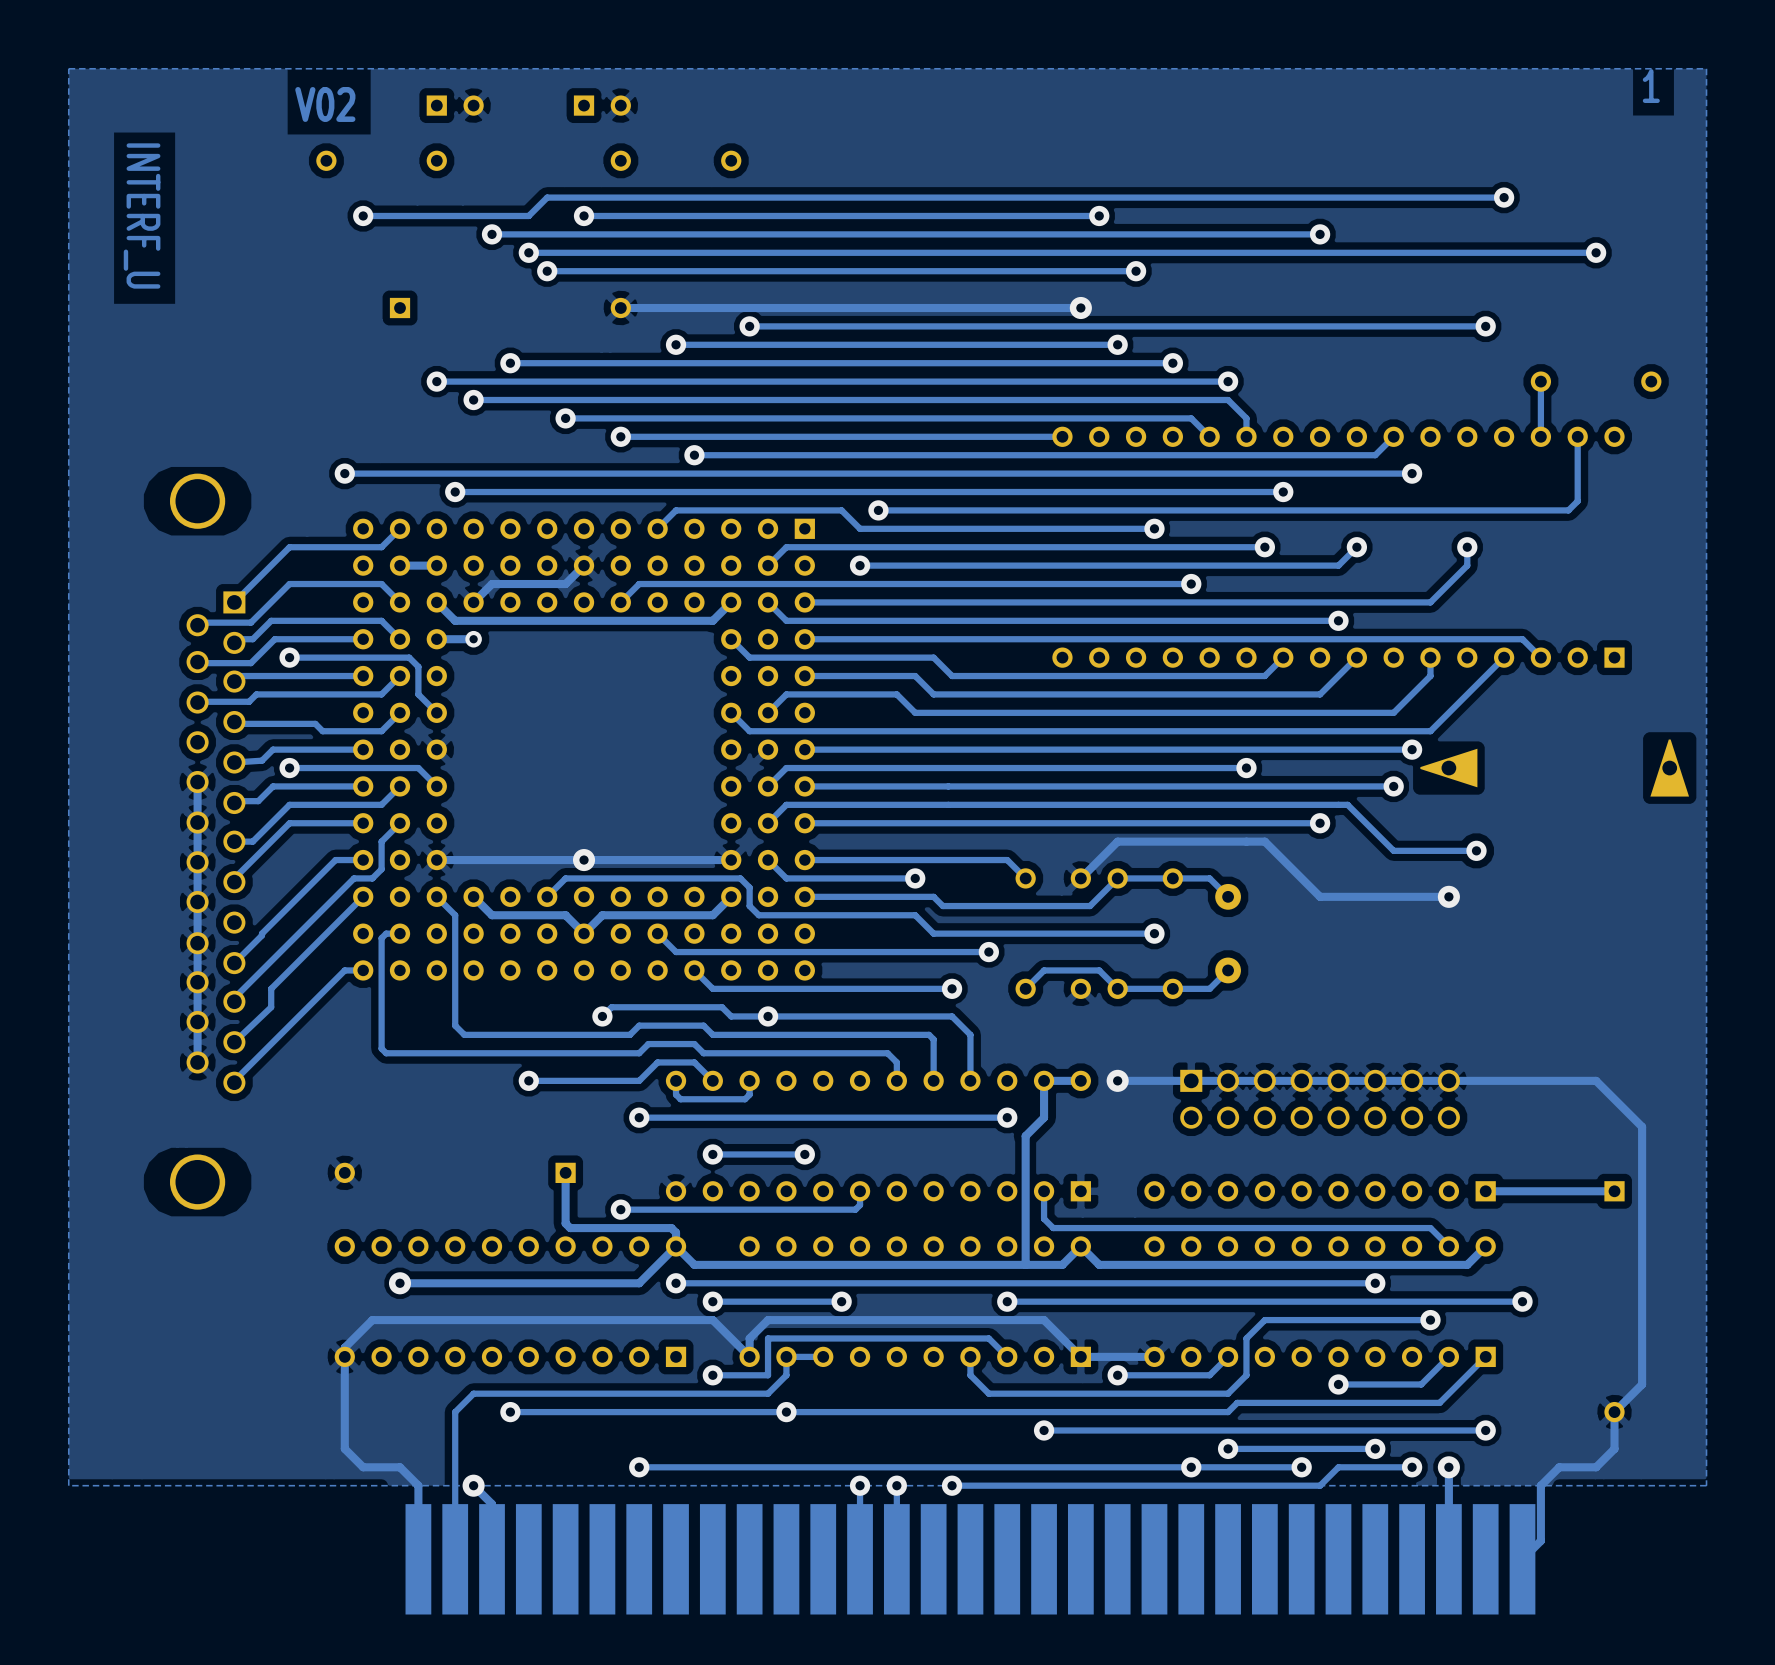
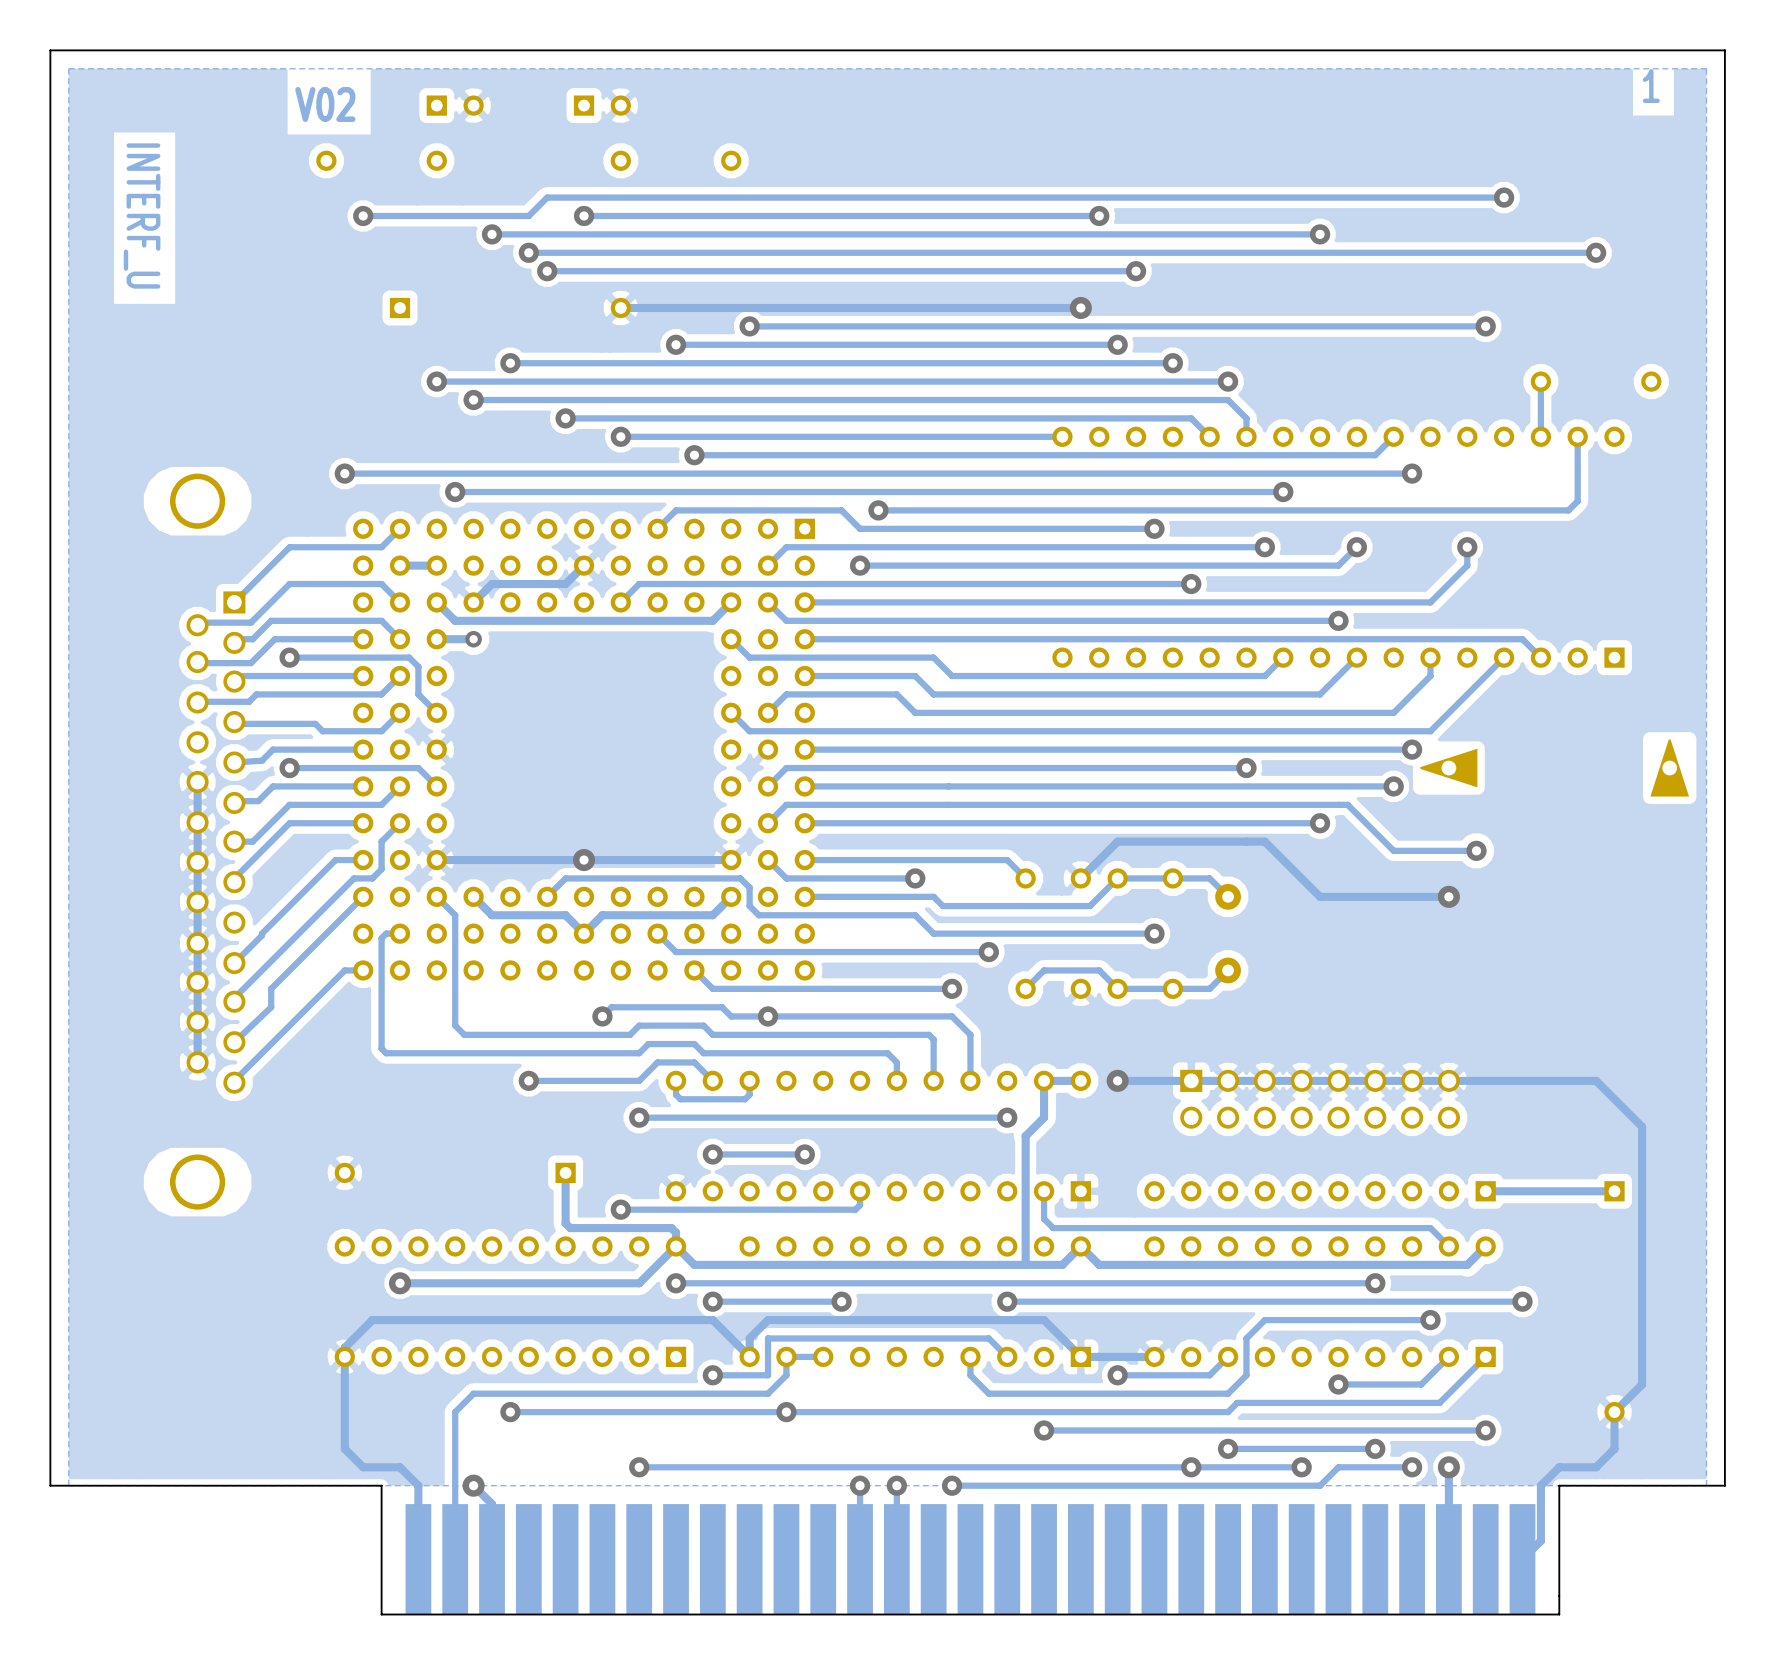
board edge: none -> (1724, 50) (1724, 1485) (1559, 1485) (1559, 1614) (381, 1614) (381, 1485) (50, 1485) (50, 50) (1724, 50)

